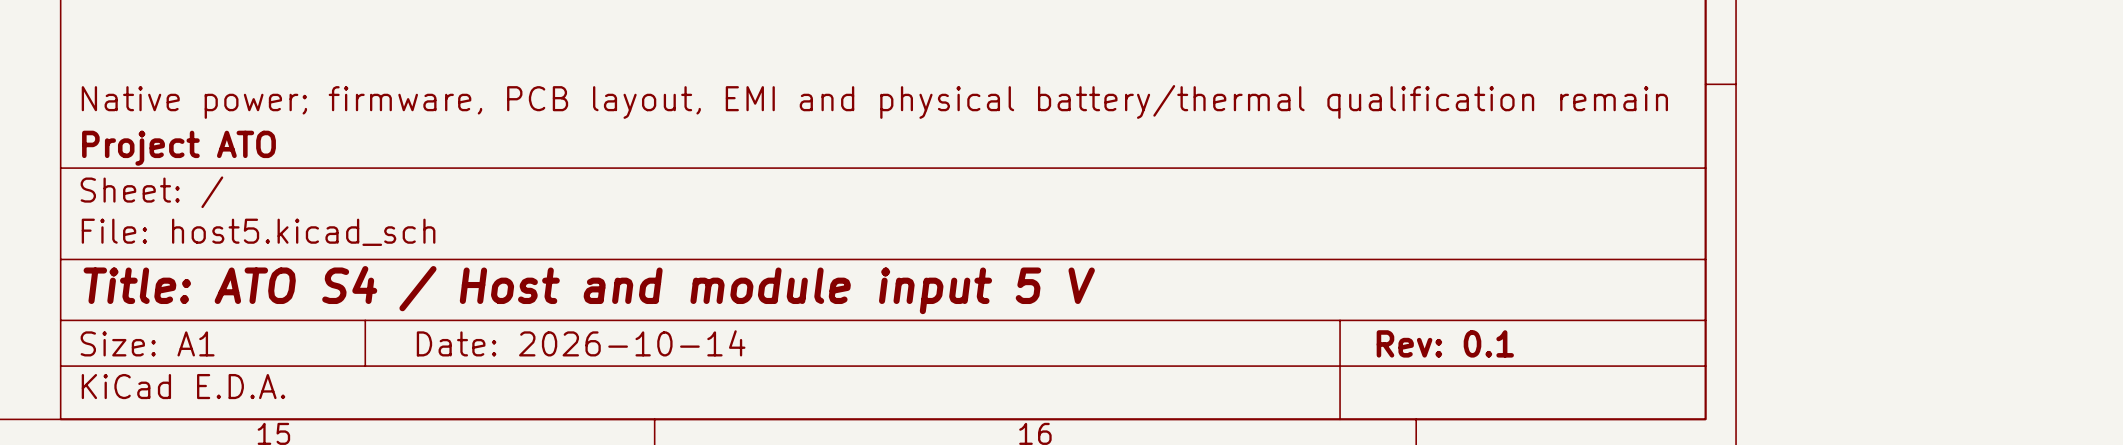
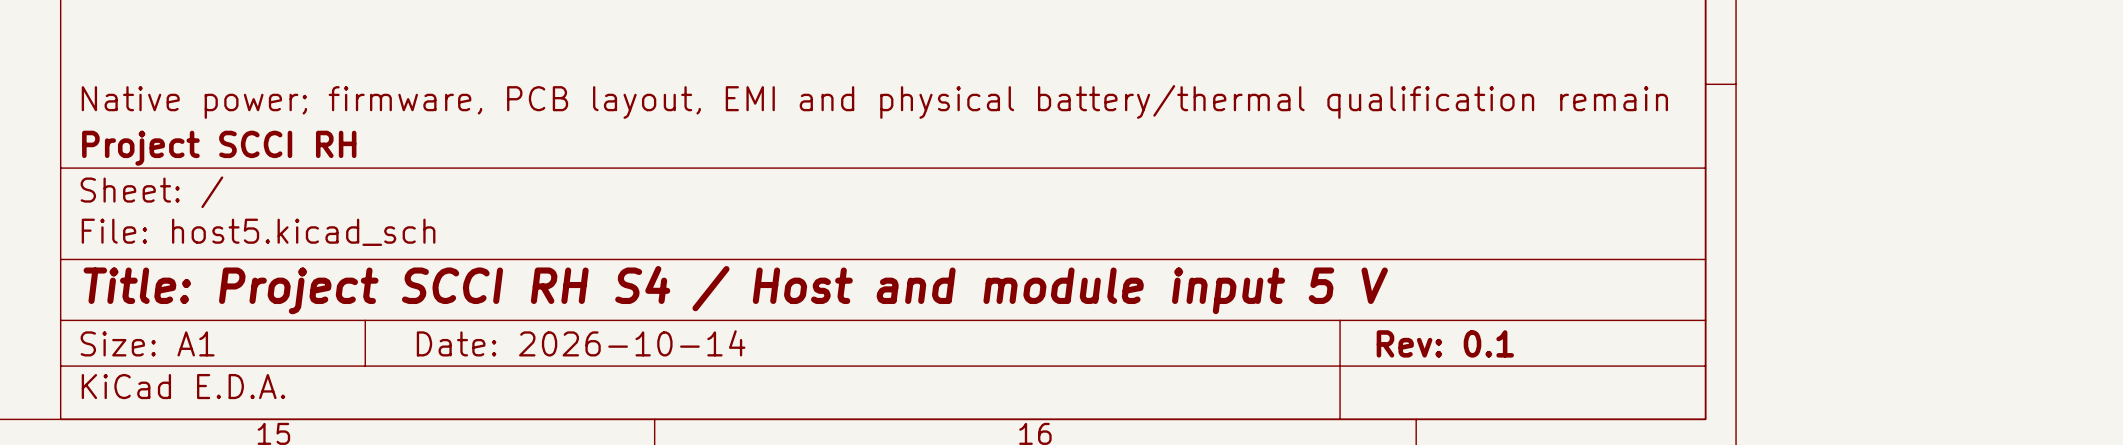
title block: Project ATO (178, 148) -> Project SCCI RH (219, 148)
title block: Title: ATO S4 / Host and module input 5 V (589, 290) -> Title: Project SCCI RH S4 / Host and module input 5 V (735, 290)

